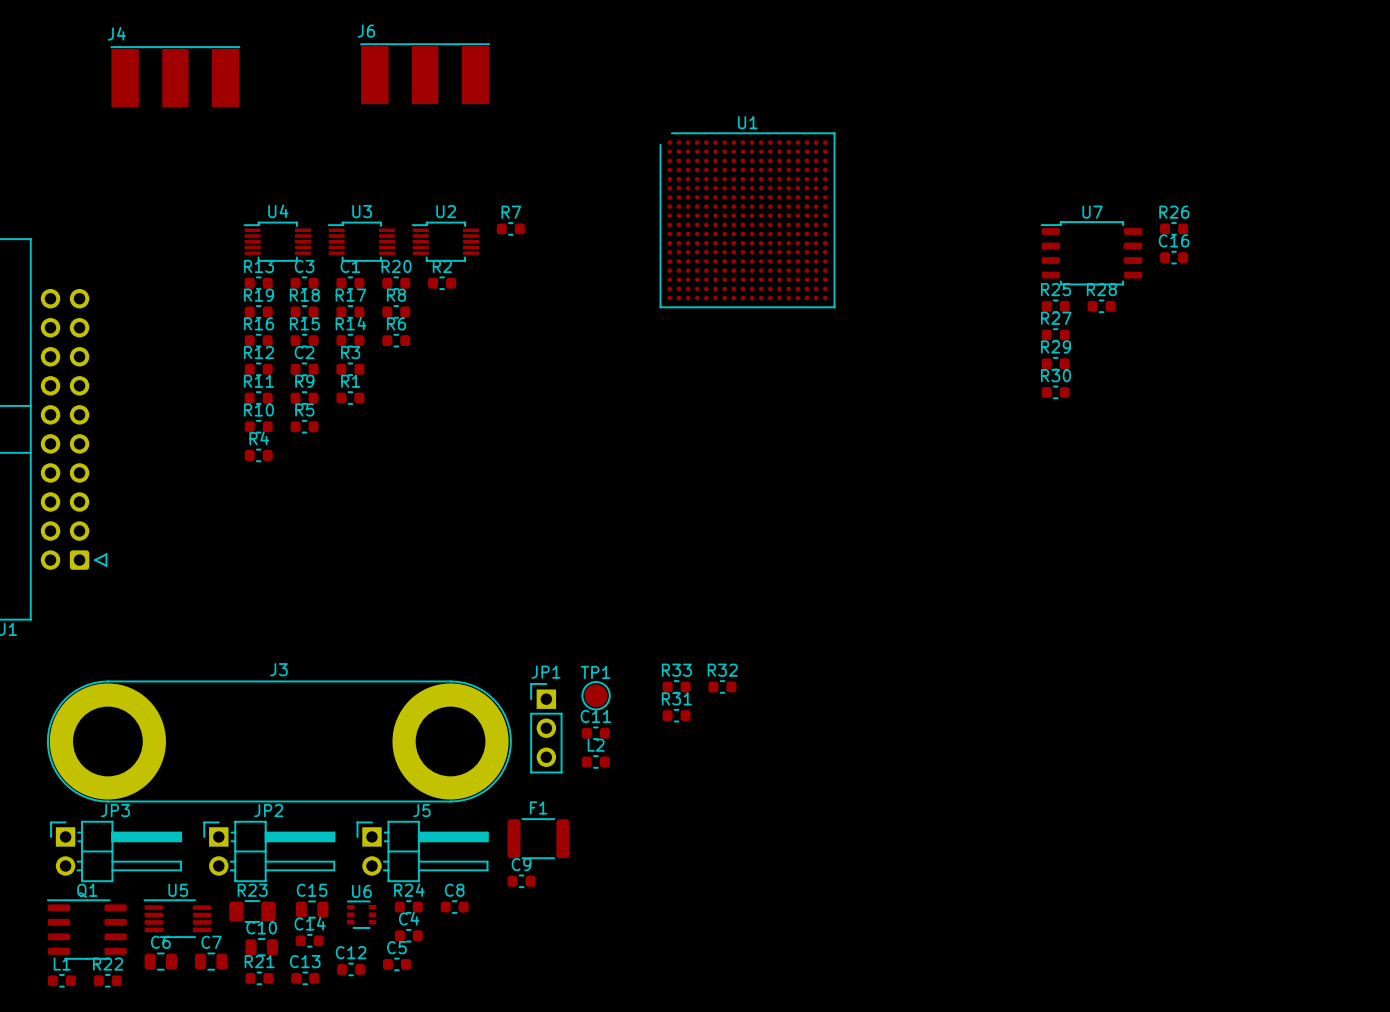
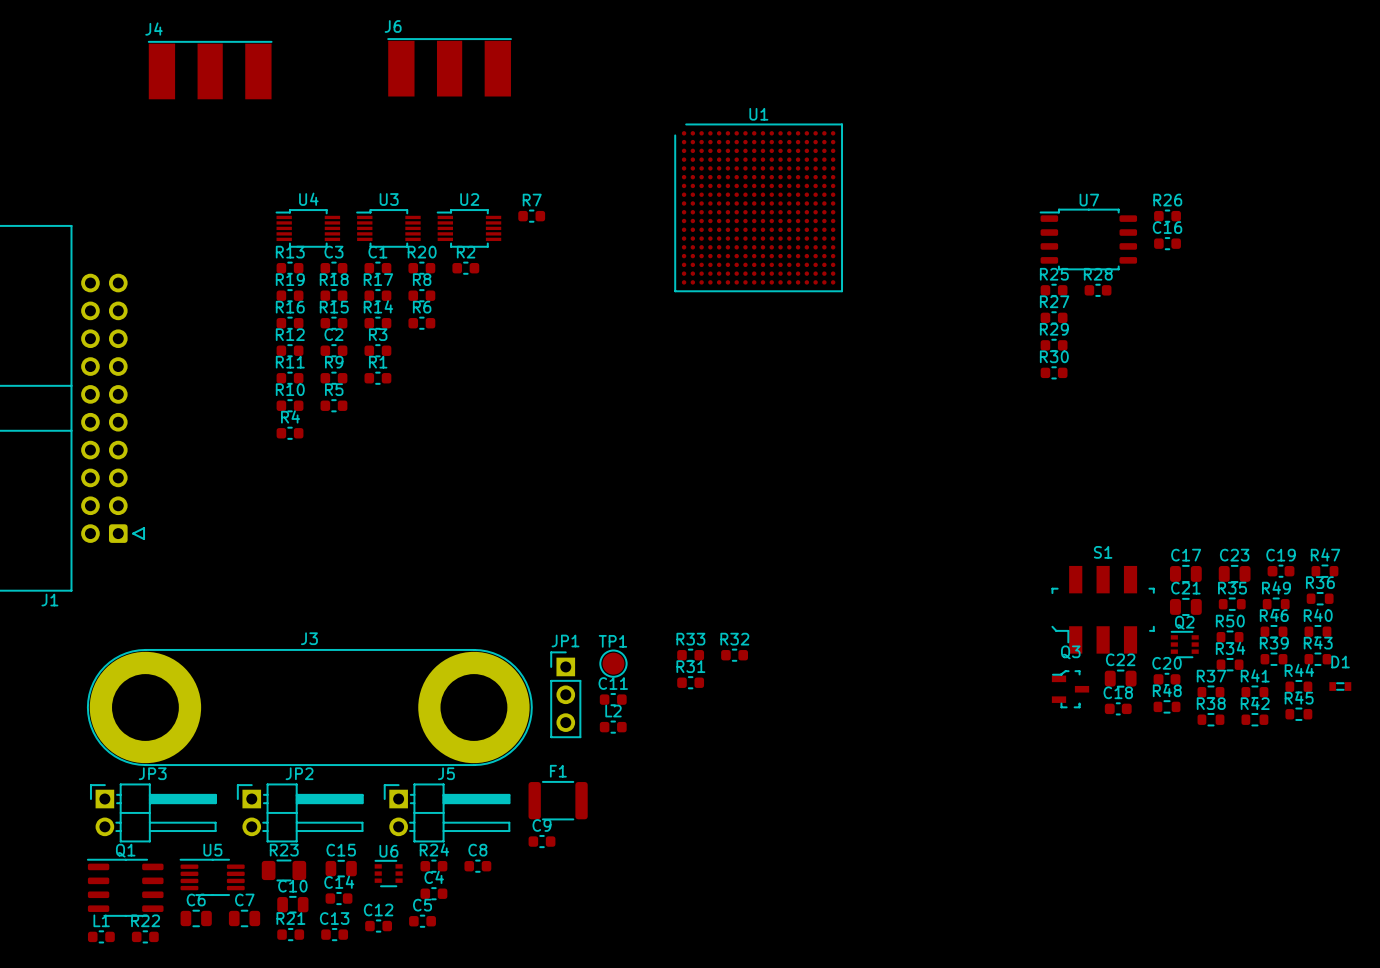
C19: none -> (1281, 571)
R47: none -> (1324, 571)
C17: none -> (1185, 573)
C23: none -> (1234, 573)
R36: none -> (1320, 598)
R35: none -> (1232, 604)
R49: none -> (1276, 604)
C21: none -> (1185, 606)
S1: none -> (1103, 609)
R46: none -> (1273, 631)
R40: none -> (1317, 631)
R50: none -> (1230, 637)
Q2: none -> (1184, 644)
R39: none -> (1273, 659)
R43: none -> (1317, 659)
R34: none -> (1230, 664)
C22: none -> (1120, 678)
C20: none -> (1167, 679)
R44: none -> (1298, 686)
D1: none -> (1340, 686)
Q3: none -> (1070, 689)
R37: none -> (1210, 692)
R41: none -> (1254, 692)
R48: none -> (1167, 706)
C18: none -> (1118, 708)
R45: none -> (1298, 714)
R38: none -> (1210, 719)
R42: none -> (1254, 719)

